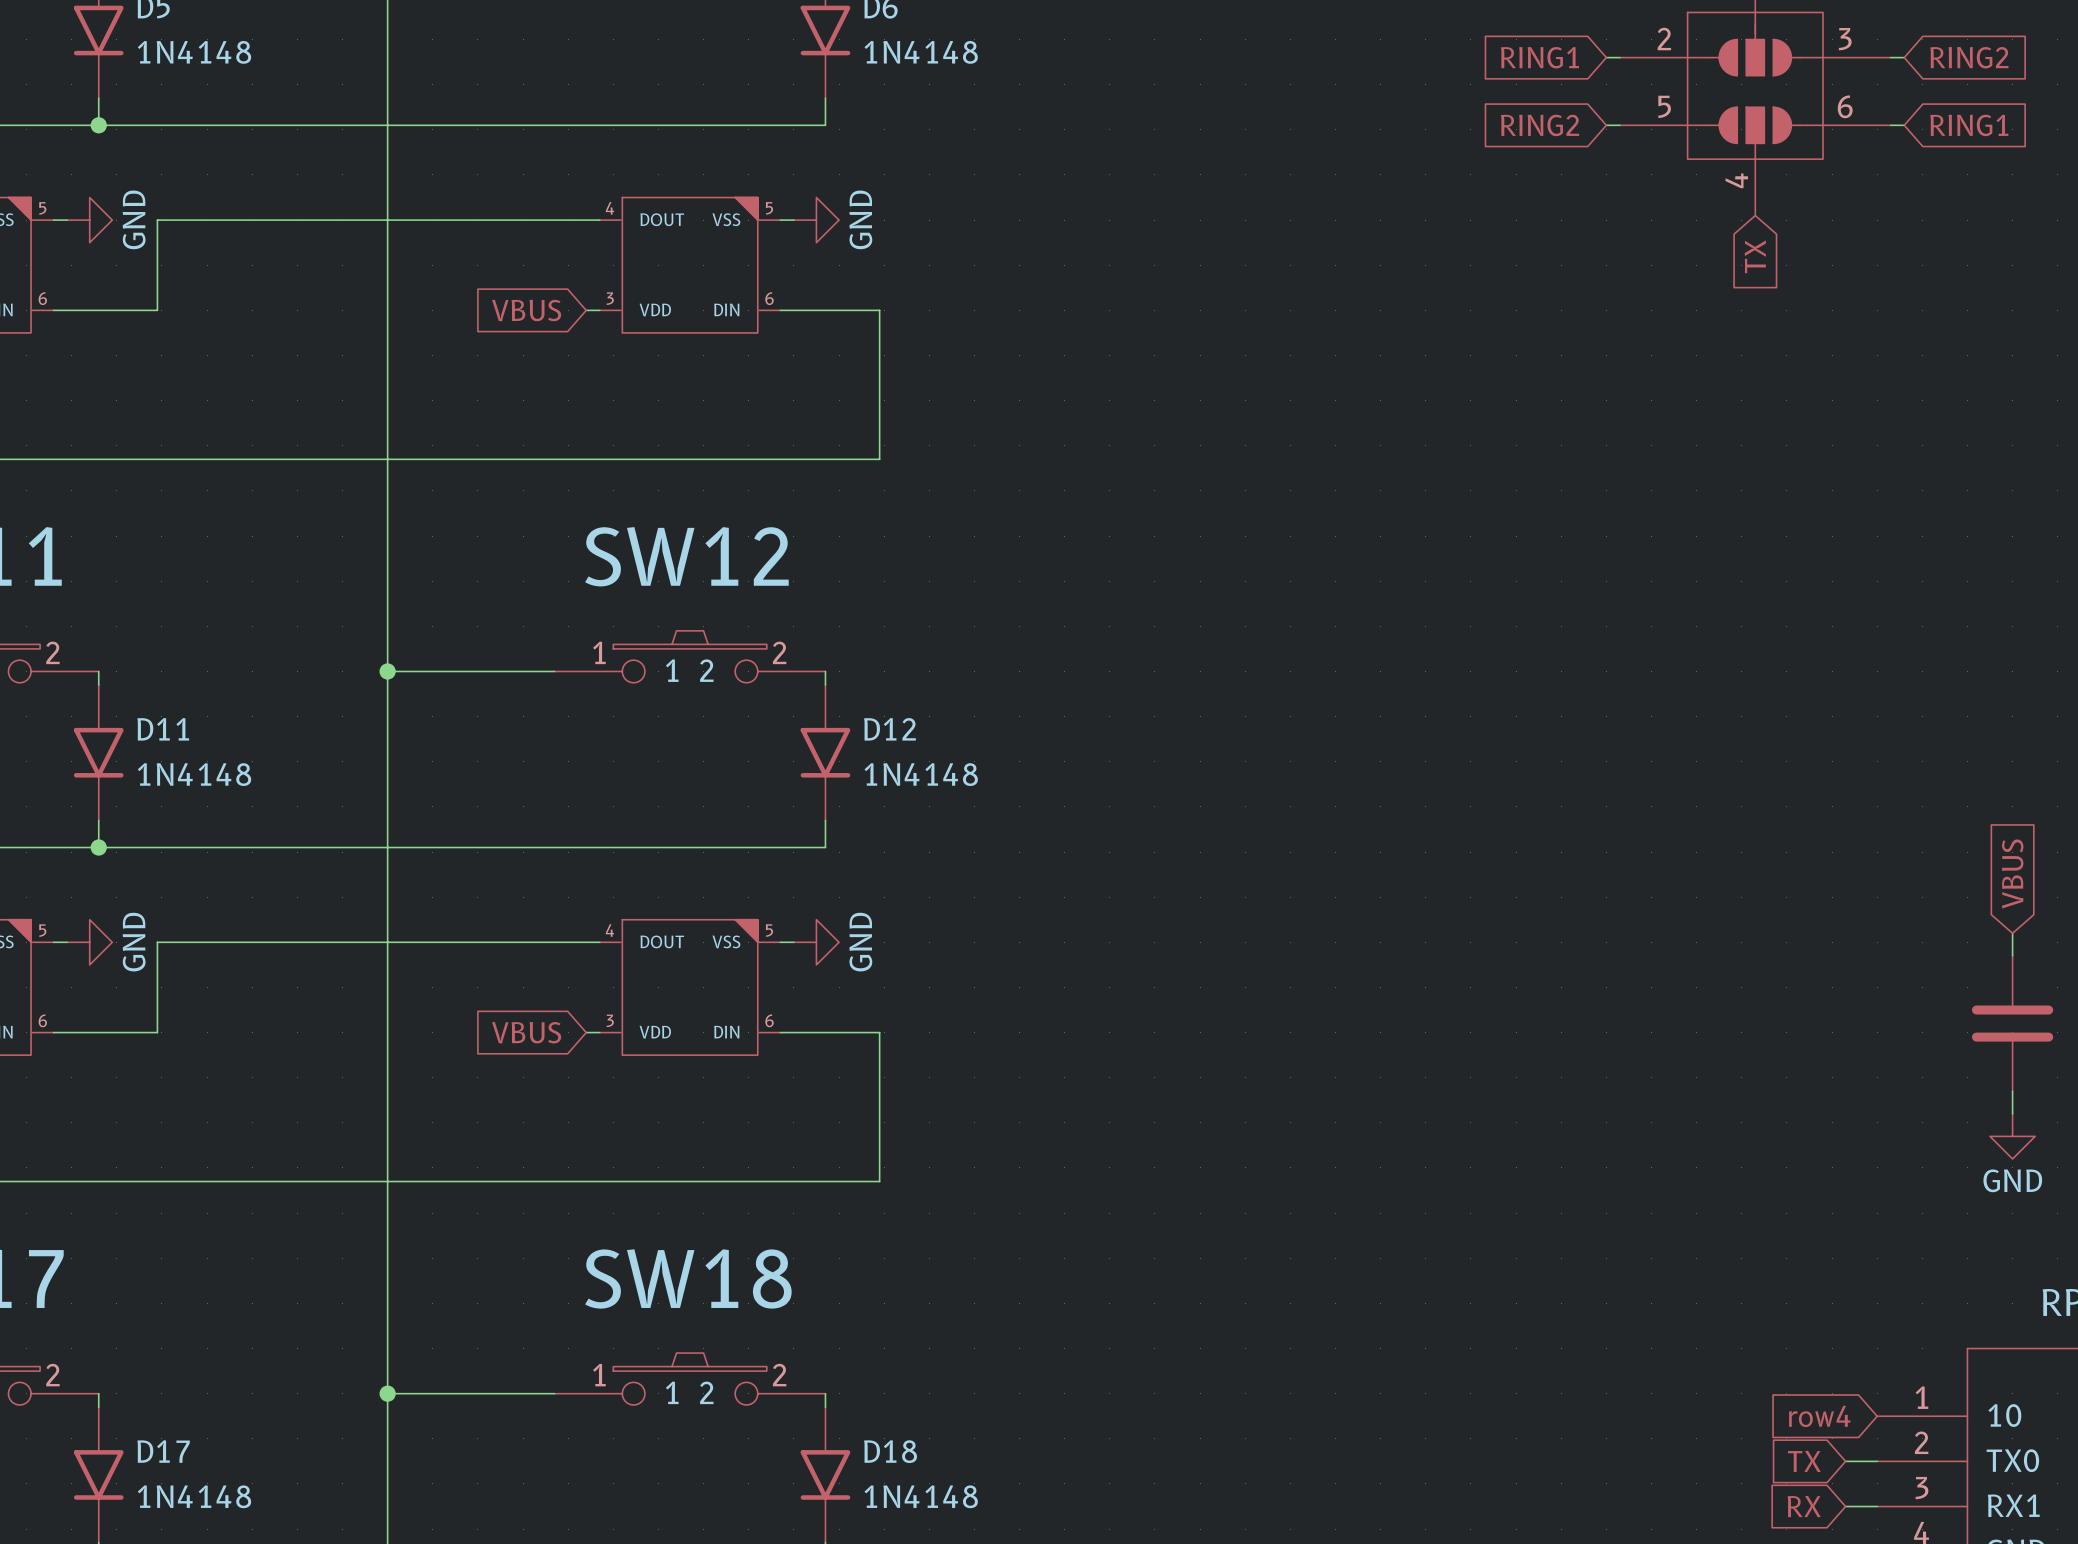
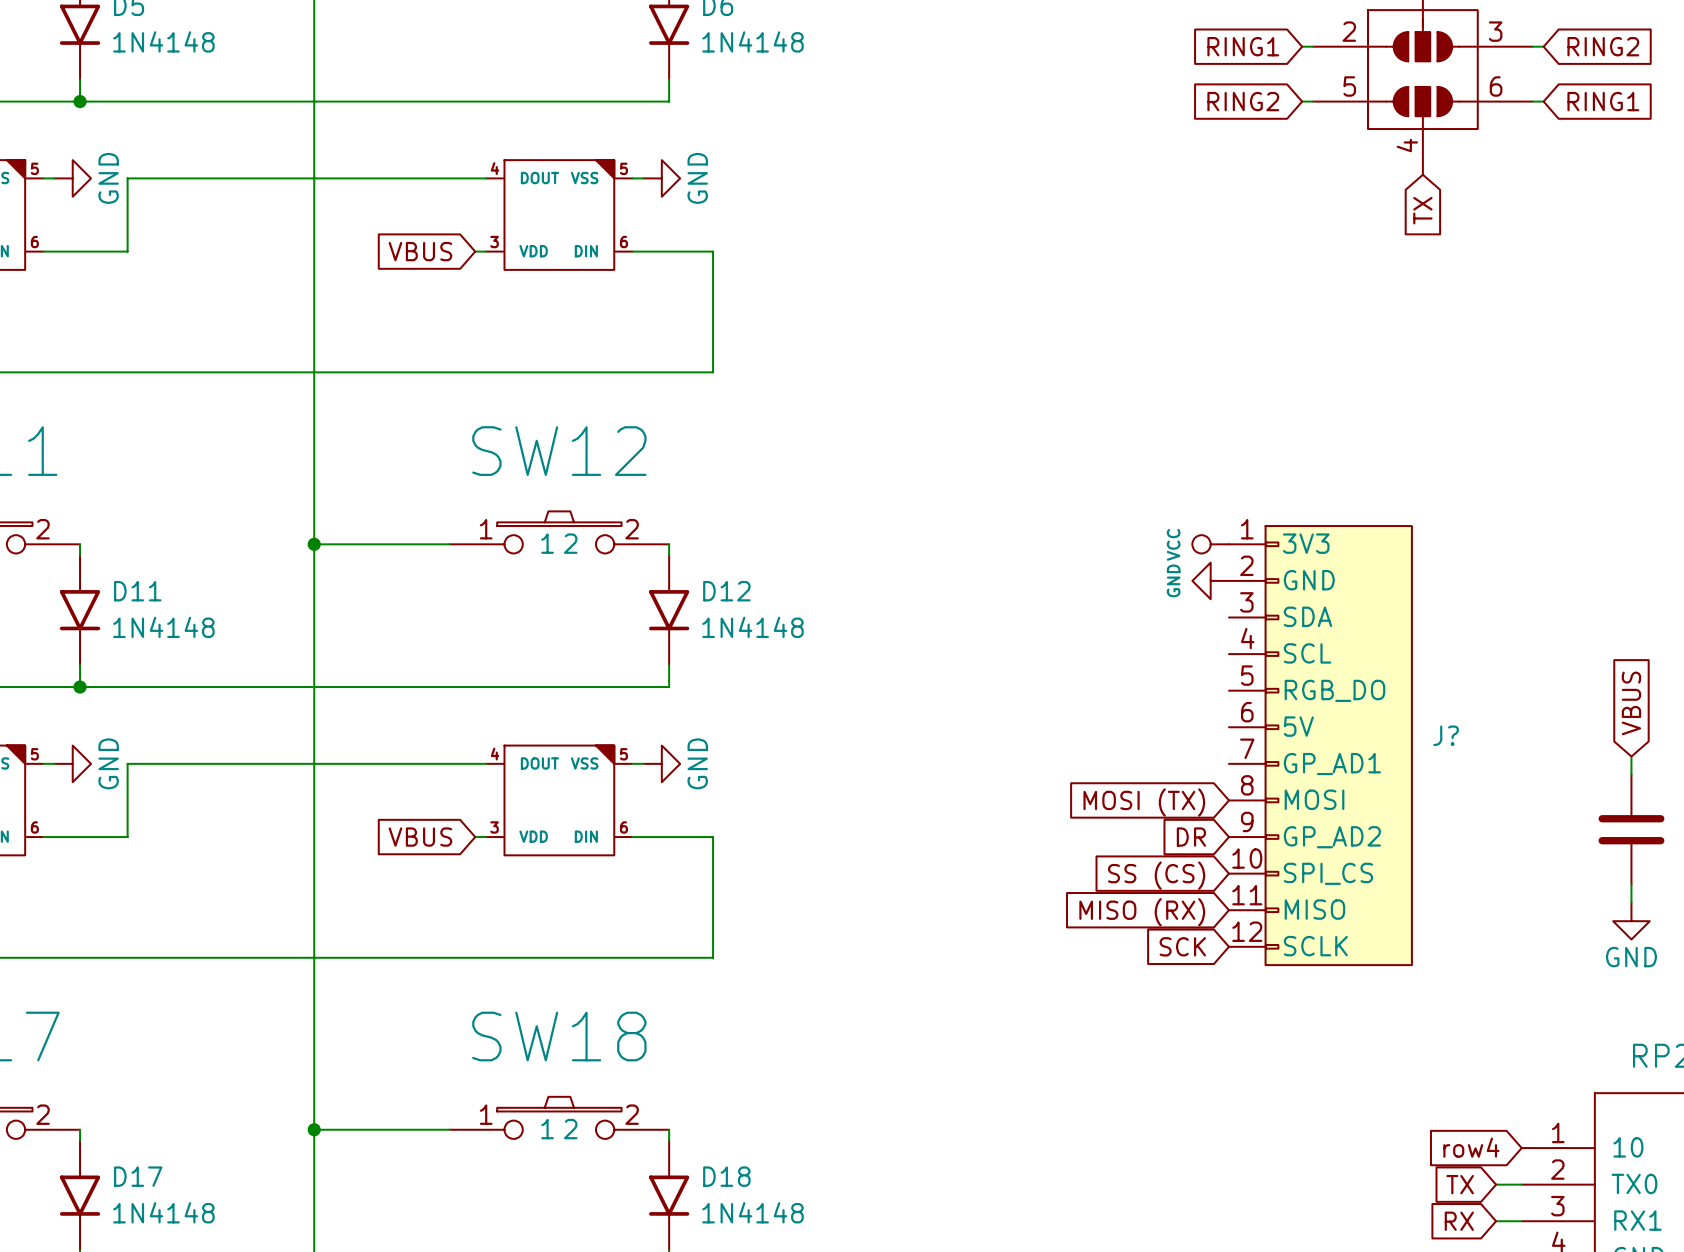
power symbol: none -> VCC (1210, 544)
power symbol: none -> GND (1210, 580)
J?: none -> (1320, 745)
global label: none -> MOSI (TX) (1144, 802)
global label: none -> DR (1191, 837)
global label: none -> SS (CS) (1156, 875)
global label: none -> MISO (RX) (1142, 912)
global label: none -> SCK (1182, 946)

